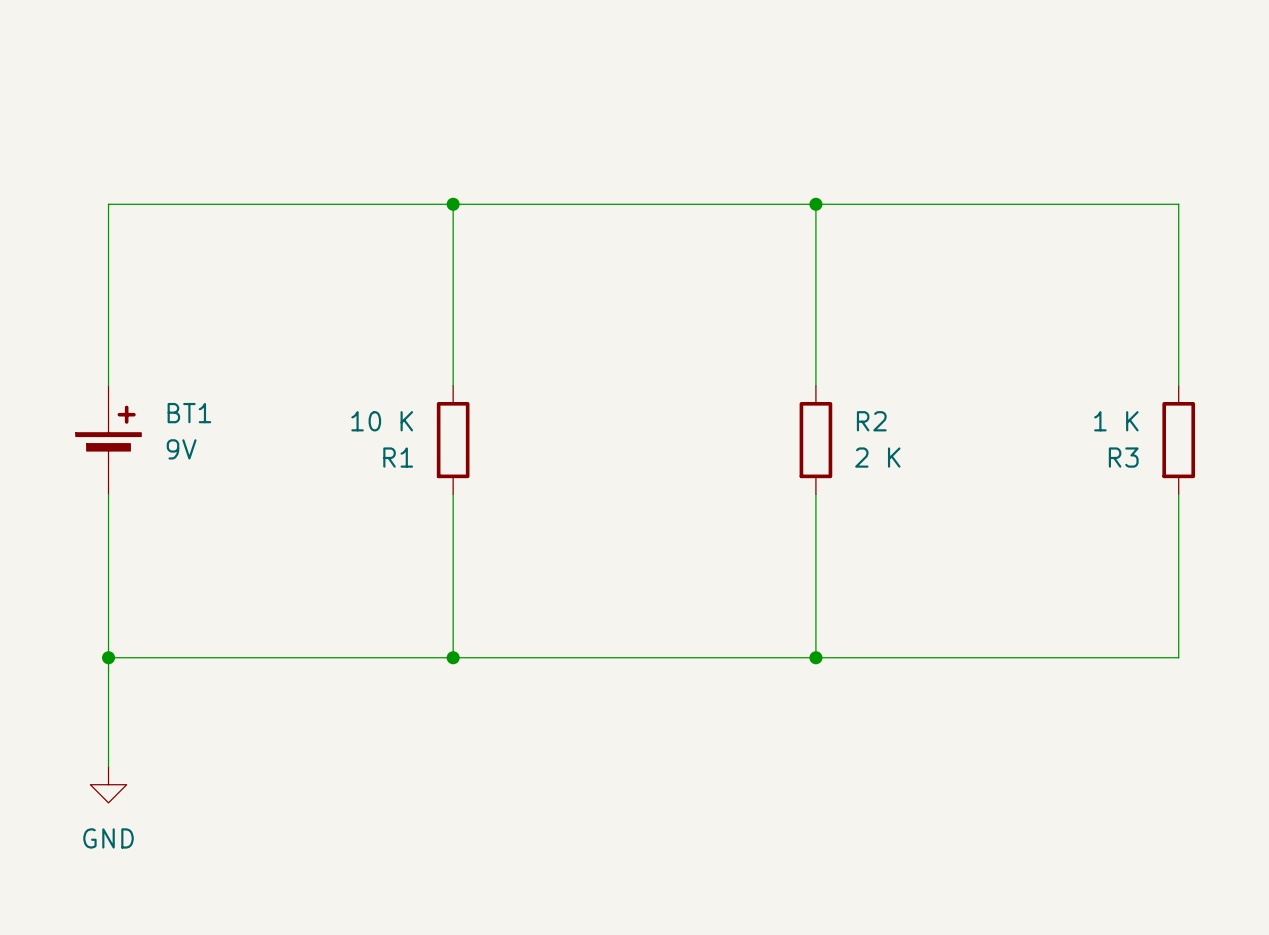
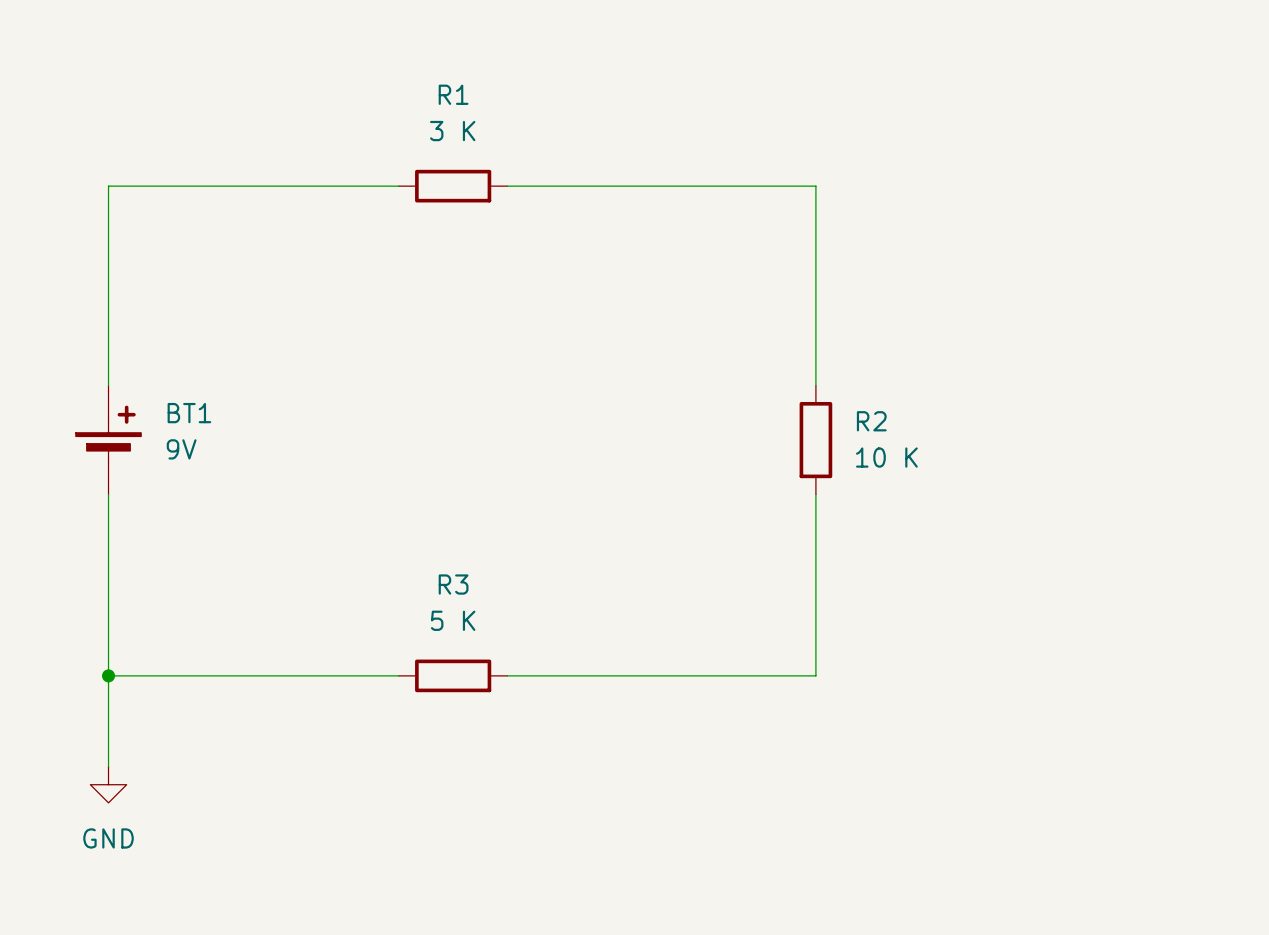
wire: none -> (507, 186) (815, 186) (815, 204)
wire: (108, 204) (1178, 204) (1178, 385) -> (108, 204) (108, 186) (398, 186)
wire: (453, 204) (453, 385) -> none
junction: (453, 204) -> none
junction: (815, 204) -> none
R1 value: 10 K (382, 421) -> 3 K (452, 131)
R3 value: 1 K (1116, 421) -> 5 K (453, 620)
R1 rotation: 0° (453, 440) -> 90° clockwise (453, 186)
R1 position: (453, 440) -> (453, 186)
R3 rotation: 0° (1178, 440) -> 90° clockwise (453, 675)
R3 position: (1178, 440) -> (453, 675)
R1 name position: R1 (398, 457) -> R1 (453, 94)
R2 value: 2 K (877, 457) -> 10 K (886, 457)
R3 name position: R3 (1123, 457) -> R3 (453, 584)
wire: (453, 494) (453, 657) -> none
wire: (1178, 494) (1178, 657) (108, 657) -> none
junction position: (108, 657) -> (108, 675)
junction: (453, 657) -> none
wire: none -> (815, 657) (815, 675) (507, 675)
junction: (815, 657) -> none
wire: none -> (108, 675) (398, 675)

